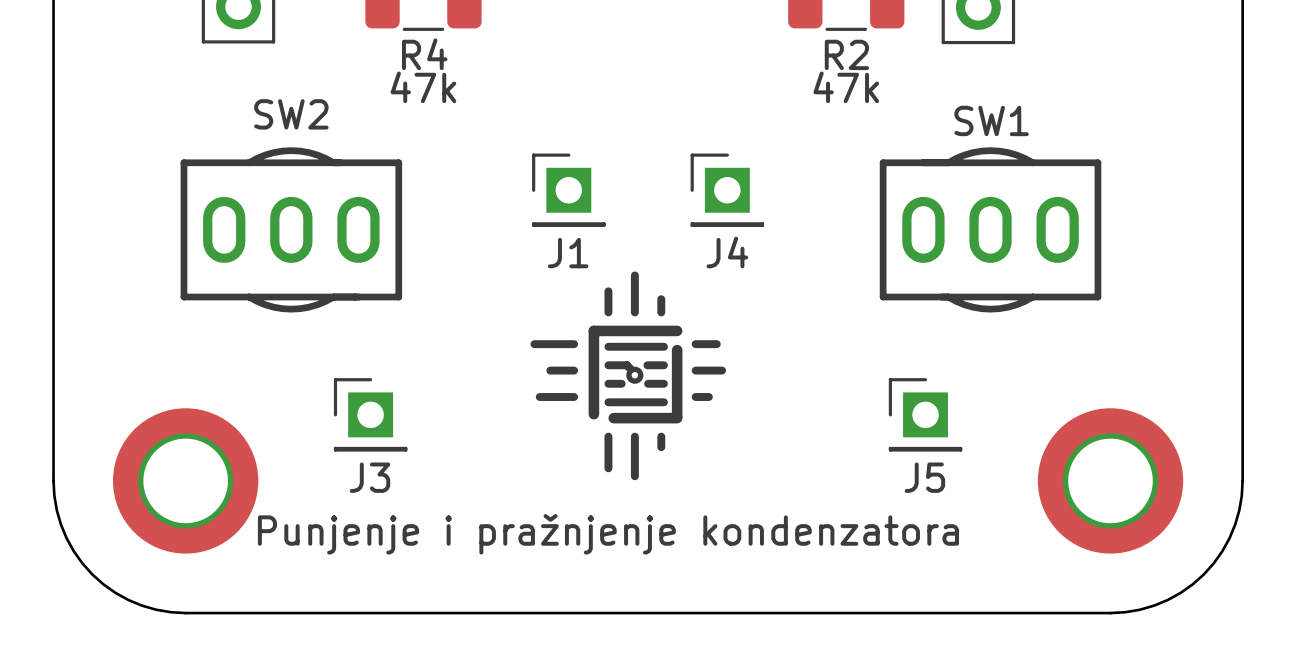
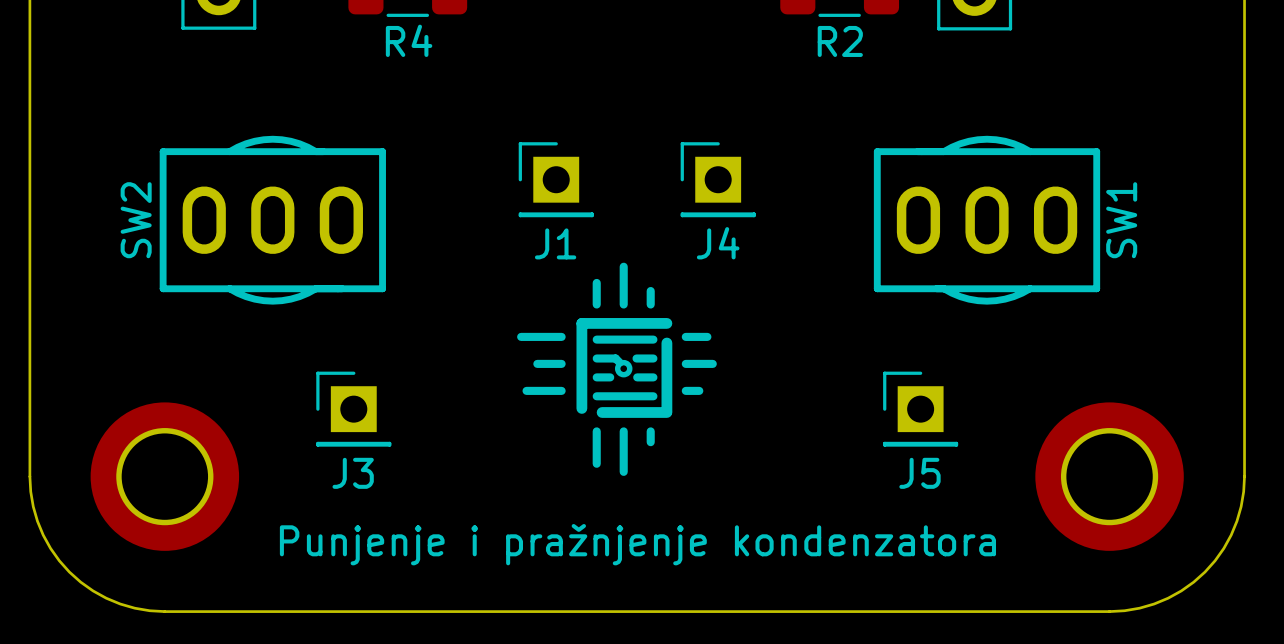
R4 value: 47k (423, 87) -> none
R2 value: 47k (846, 87) -> none
SW2 name rotation: 0° (291, 114) -> 90° counterclockwise (136, 220)
SW2 name position: SW2 (291, 114) -> SW2 (136, 220)
SW1 name rotation: 0° (991, 120) -> 90° counterclockwise (1121, 220)
SW1 name position: SW1 (991, 120) -> SW1 (1121, 220)
text position: Punjenje i pražnjenje kondenzatora (608, 534) -> Punjenje i pražnjenje kondenzatora (637, 544)

